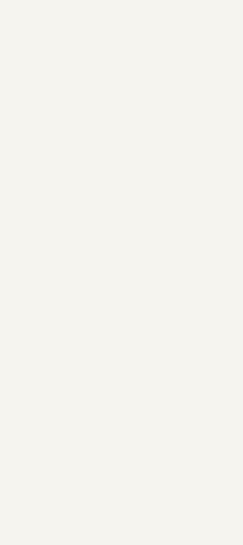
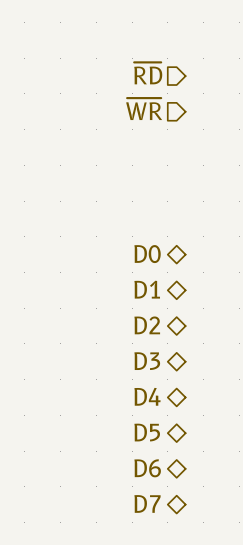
hierarchical label: none -> ~{RD} (148, 73)
hierarchical label: none -> ~{WR} (144, 109)
hierarchical label: none -> D0 (147, 254)
hierarchical label: none -> D1 (147, 289)
hierarchical label: none -> D2 (147, 325)
hierarchical label: none -> D3 (147, 361)
hierarchical label: none -> D4 (147, 396)
hierarchical label: none -> D5 (147, 432)
hierarchical label: none -> D6 (147, 468)
hierarchical label: none -> D7 (147, 503)

